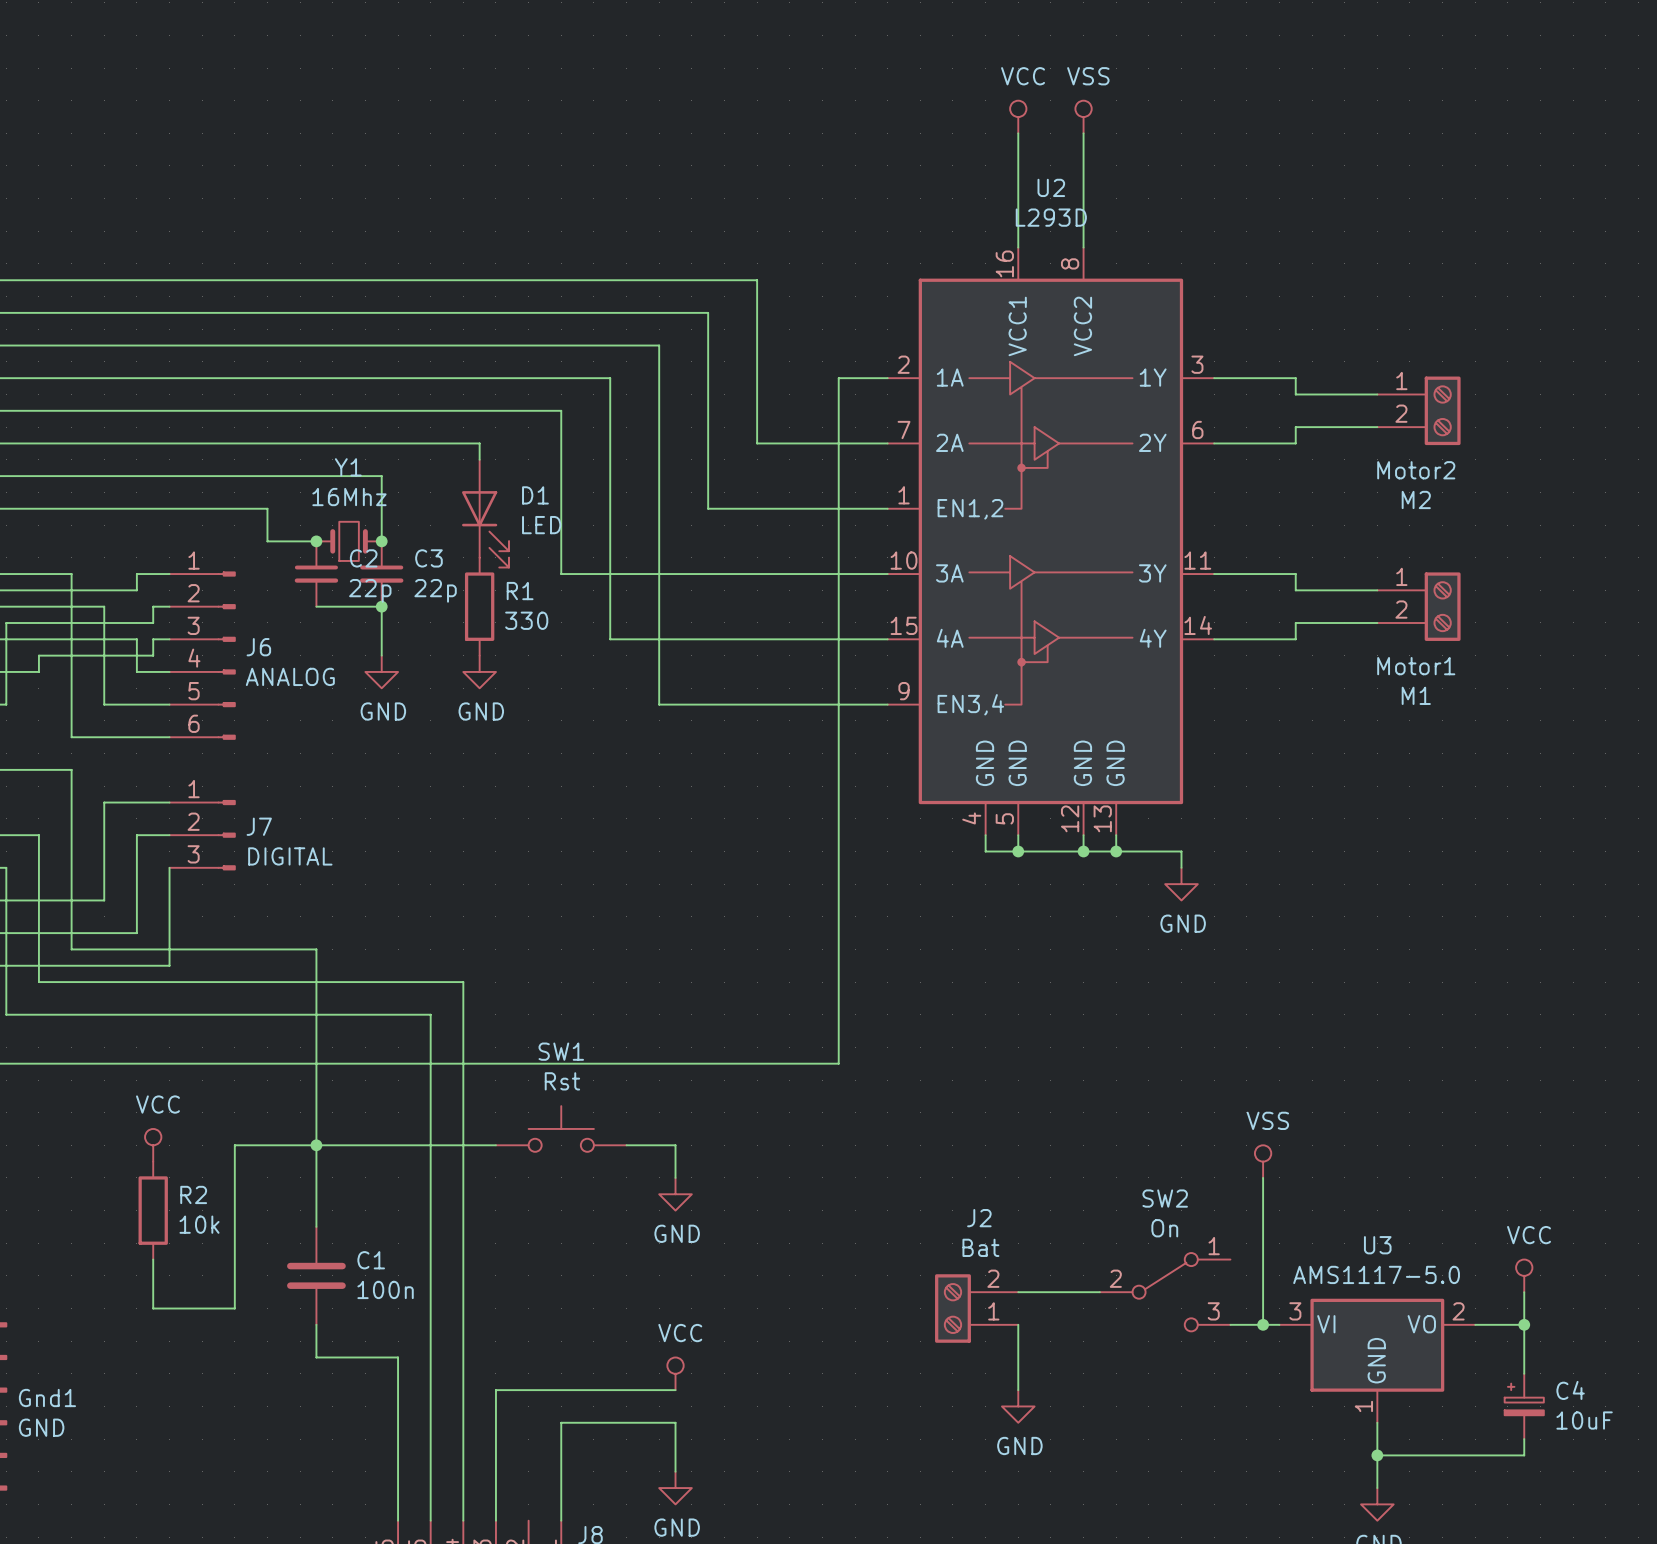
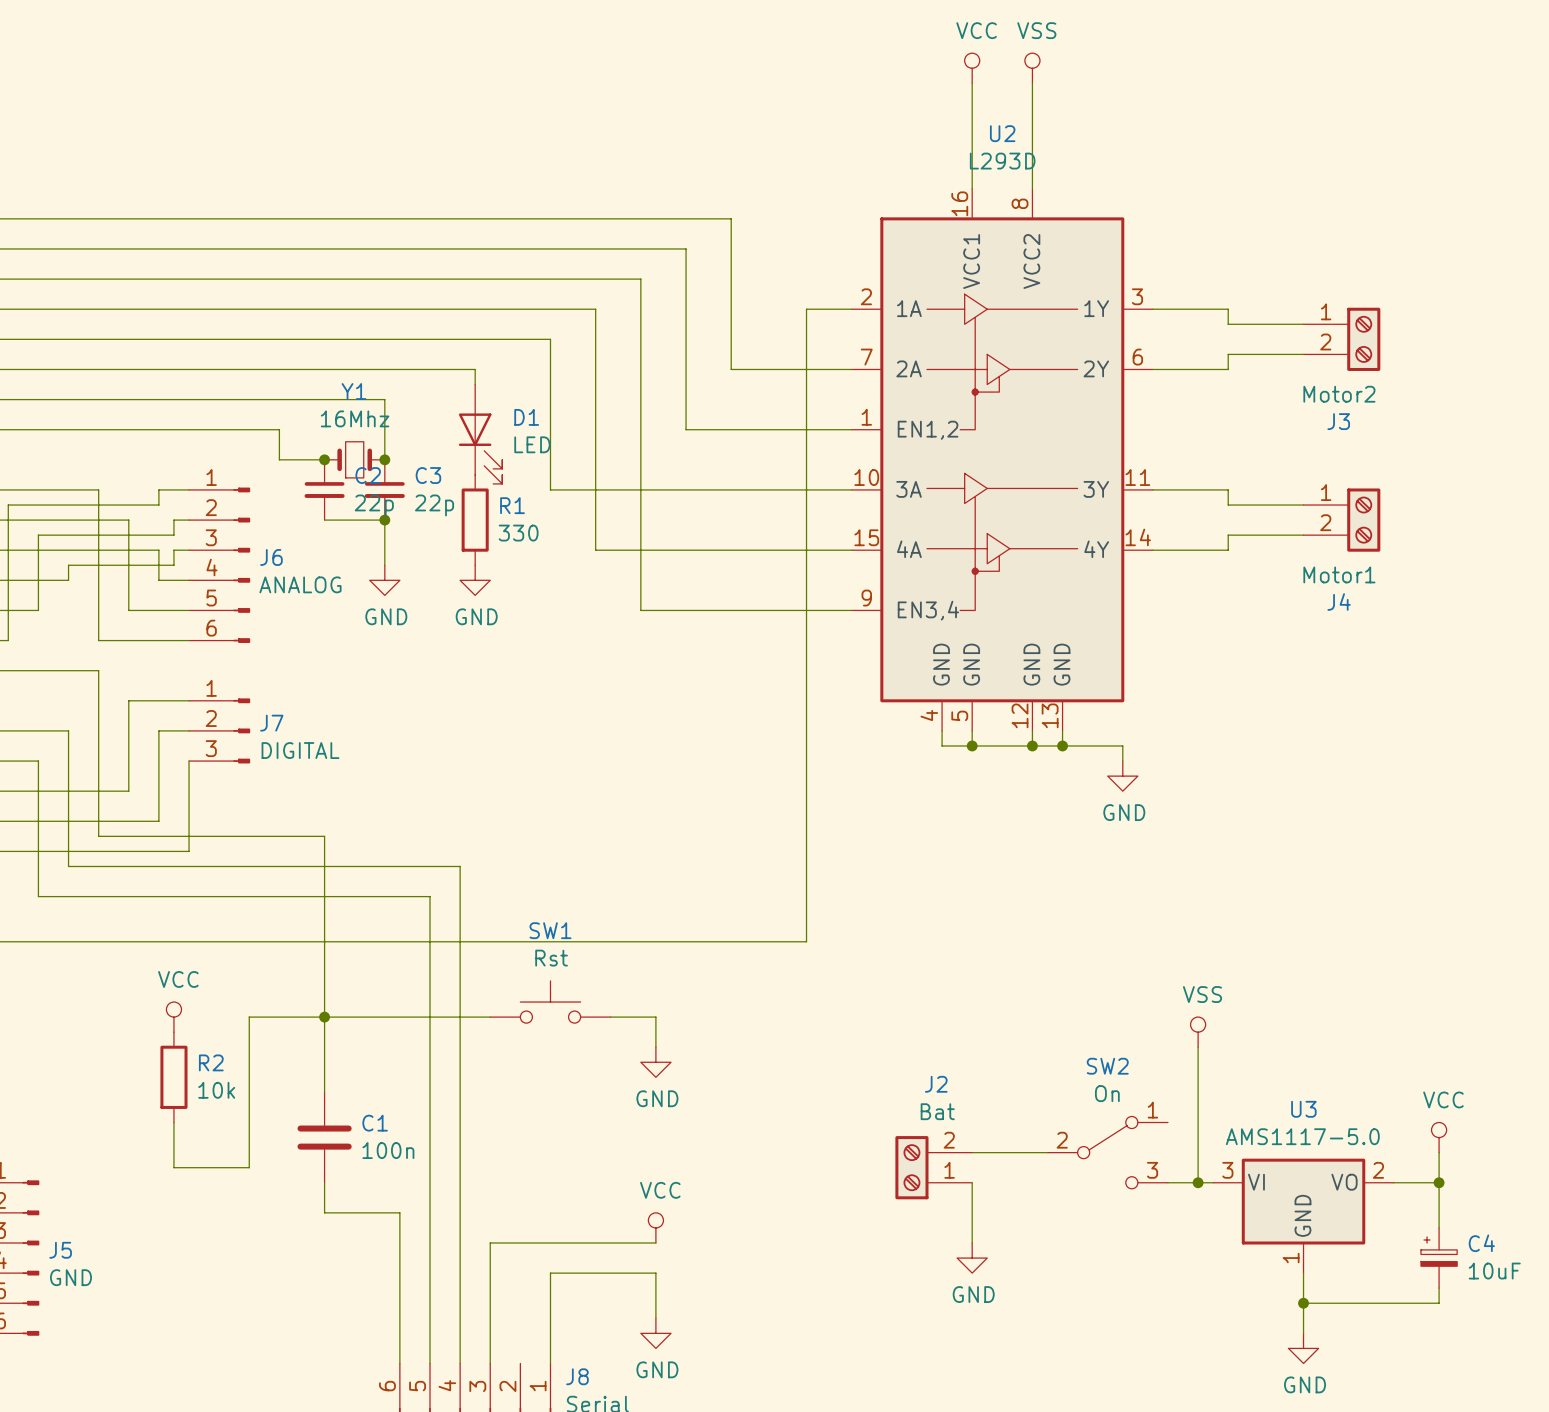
M2 name: M2 (1416, 499) -> J3 (1338, 421)
M1 name: M1 (1416, 695) -> J4 (1339, 601)
Gnd1 name: Gnd1 (47, 1398) -> J5 (60, 1250)

